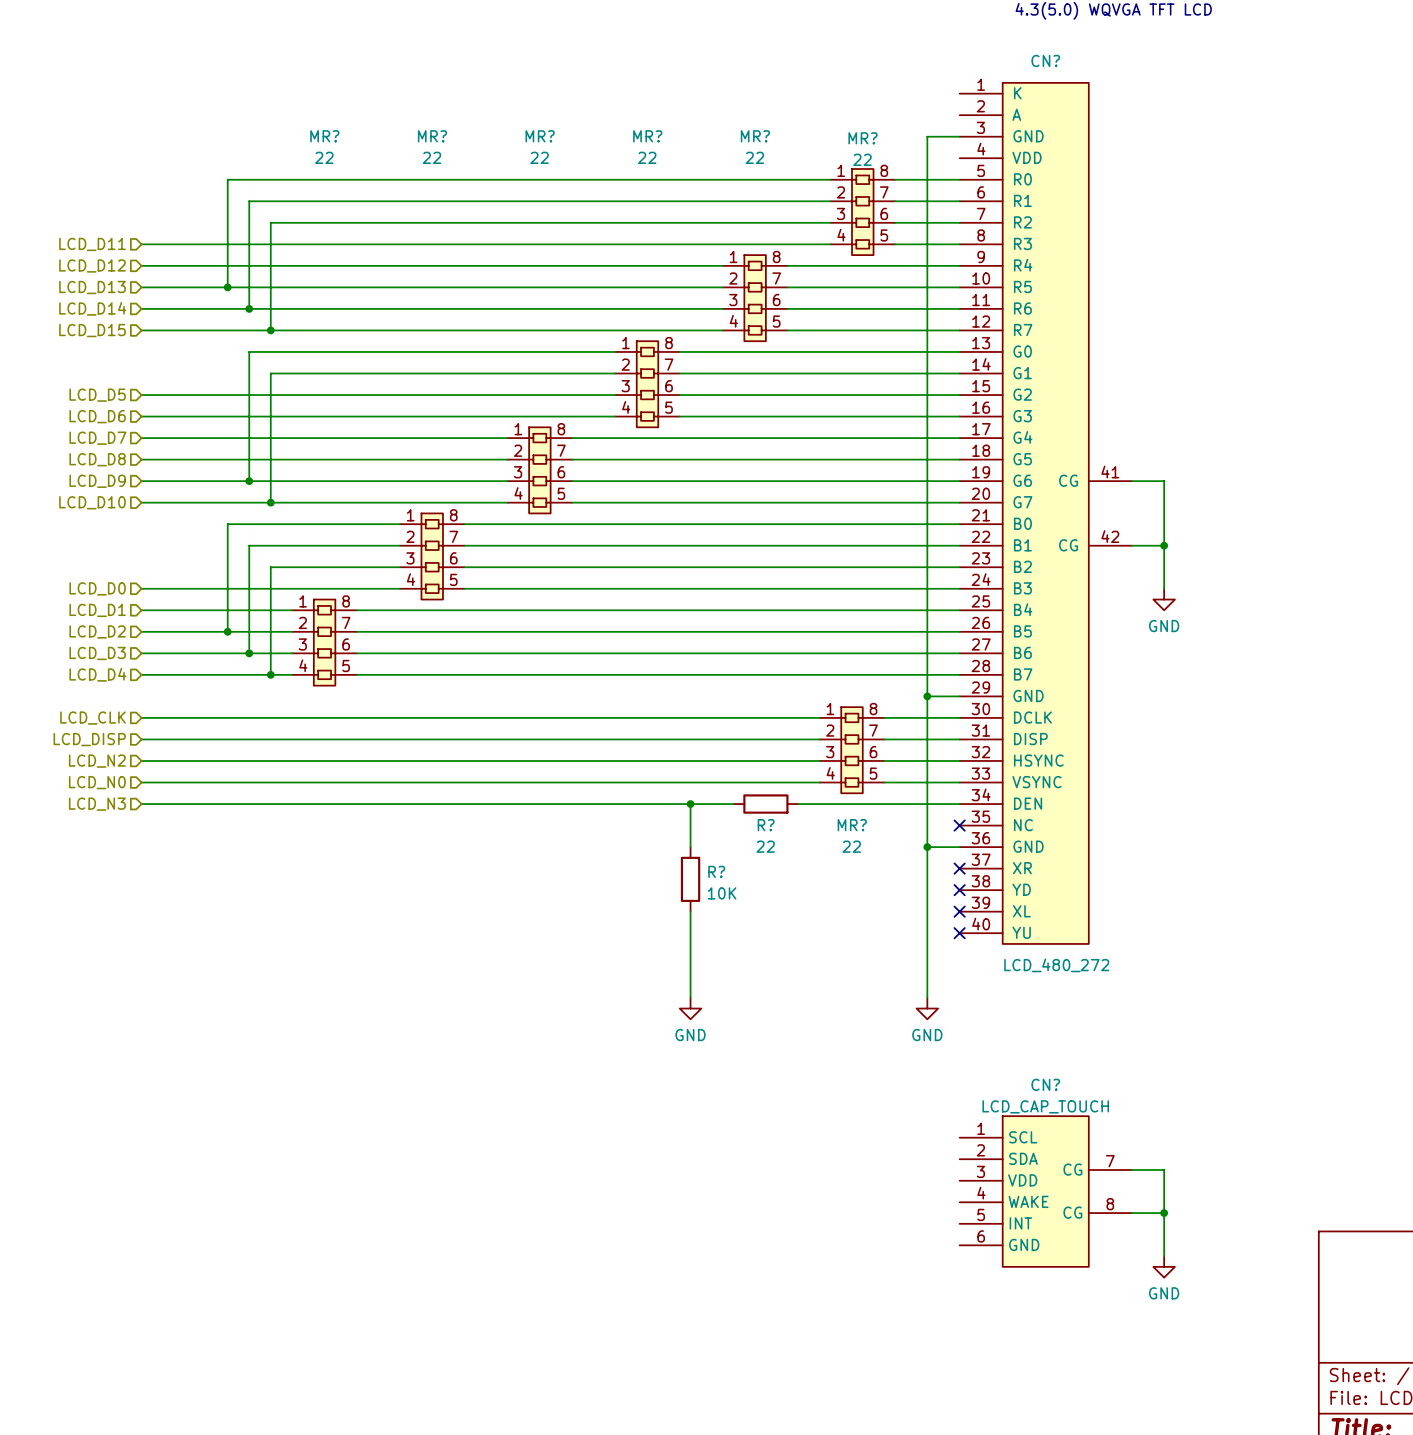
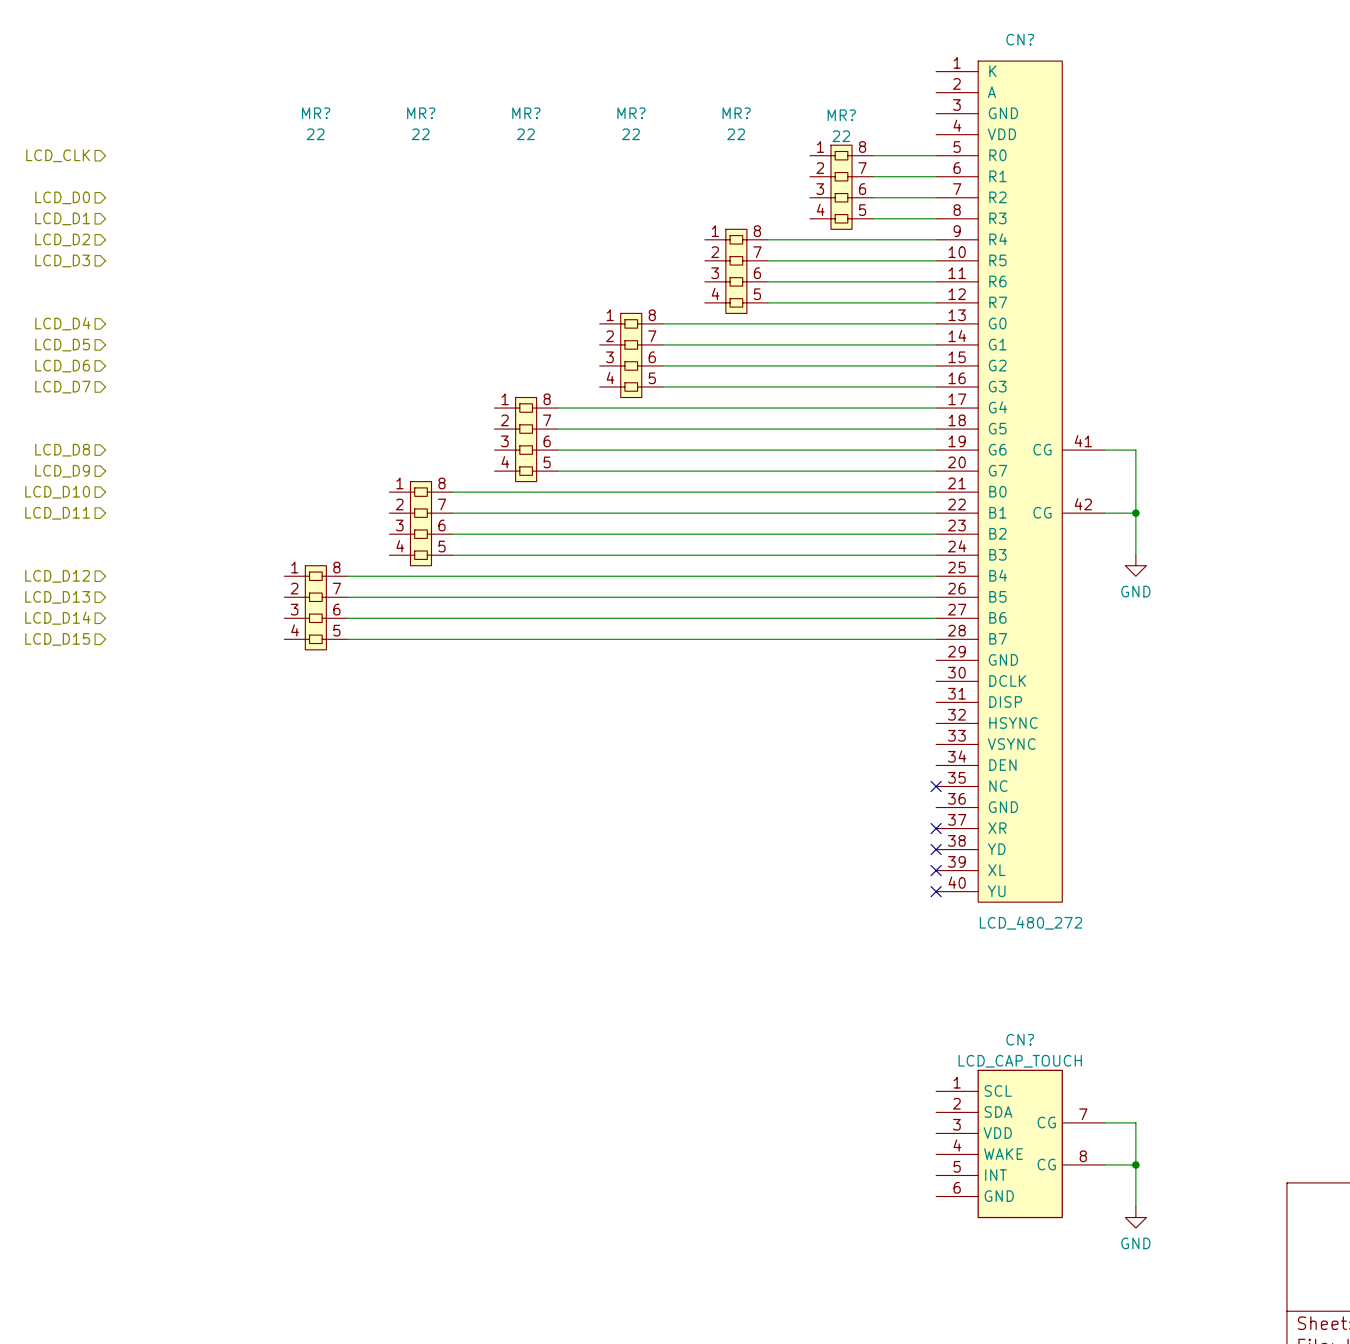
wire: (959, 136) (927, 136) (927, 997) -> none
hierarchical label: none -> LCD_CLK (58, 155)
wire: (830, 179) (227, 179) (227, 287) -> none
wire: (830, 201) (249, 201) (249, 308) -> none
hierarchical label: none -> LCD_D0 (62, 197)
wire: (830, 222) (270, 222) (270, 330) -> none
hierarchical label: none -> LCD_D1 (62, 218)
hierarchical label: LCD_D11 (92, 244) -> none
wire: (141, 244) (830, 244) -> none
hierarchical label: none -> LCD_D2 (62, 239)
hierarchical label: LCD_D12 (92, 265) -> none
wire: (141, 265) (722, 265) -> none
hierarchical label: none -> LCD_D3 (62, 260)
hierarchical label: LCD_D13 (92, 287) -> none
wire: (141, 287) (722, 287) -> none
junction: (227, 287) -> none
hierarchical label: LCD_D14 (92, 308) -> none
wire: (141, 308) (722, 308) -> none
junction: (249, 308) -> none
hierarchical label: LCD_D15 (92, 330) -> LCD_D4 (62, 323)
wire: (141, 330) (722, 330) -> none
junction: (270, 330) -> none
wire: (615, 351) (249, 351) (249, 481) -> none
wire: (615, 373) (270, 373) (270, 502) -> none
hierarchical label position: LCD_D5 (97, 395) -> LCD_D5 (62, 345)
wire: (141, 395) (615, 395) -> none
hierarchical label position: LCD_D6 (97, 416) -> LCD_D6 (62, 366)
wire: (141, 416) (615, 416) -> none
hierarchical label position: LCD_D7 (97, 438) -> LCD_D7 (62, 387)
wire: (141, 438) (507, 438) -> none
hierarchical label position: LCD_D8 (97, 459) -> LCD_D8 (62, 450)
wire: (141, 459) (507, 459) -> none
hierarchical label position: LCD_D9 (97, 481) -> LCD_D9 (62, 471)
wire: (141, 481) (507, 481) -> none
junction: (249, 481) -> none
hierarchical label position: LCD_D10 (92, 502) -> LCD_D10 (57, 492)
wire: (141, 502) (507, 502) -> none
junction: (270, 502) -> none
wire: (399, 524) (227, 524) (227, 631) -> none
hierarchical label: none -> LCD_D11 (57, 513)
wire: (399, 545) (249, 545) (249, 653) -> none
wire: (399, 567) (270, 567) (270, 674) -> none
hierarchical label: LCD_D0 (97, 588) -> none
wire: (141, 588) (399, 588) -> none
hierarchical label: none -> LCD_D12 (57, 576)
hierarchical label: LCD_D1 (97, 610) -> none
wire: (141, 610) (292, 610) -> none
hierarchical label: none -> LCD_D13 (57, 597)
hierarchical label: LCD_D2 (97, 631) -> none
wire: (141, 631) (292, 631) -> none
junction: (227, 631) -> none
hierarchical label: none -> LCD_D14 (57, 618)
hierarchical label: LCD_D3 (97, 653) -> none
wire: (141, 653) (292, 653) -> none
junction: (249, 653) -> none
hierarchical label: none -> LCD_D15 (57, 639)
hierarchical label: LCD_D4 (97, 674) -> none
wire: (141, 674) (292, 674) -> none
junction: (270, 674) -> none
wire: (927, 696) (959, 696) -> none
junction: (927, 696) -> none
wire: (141, 717) (819, 717) -> none
wire: (884, 717) (959, 717) -> none
hierarchical label: LCD_CLK (93, 718) -> none
hierarchical label: LCD_DISP (89, 739) -> none
wire: (141, 739) (819, 739) -> none
wire: (884, 739) (959, 739) -> none
MR?: 22 (852, 750) -> none
wire: (141, 760) (819, 760) -> none
wire: (884, 760) (959, 760) -> none
hierarchical label: LCD_N2 (97, 761) -> none
hierarchical label: LCD_N0 (97, 782) -> none
wire: (141, 782) (819, 782) -> none
wire: (884, 782) (959, 782) -> none
hierarchical label: LCD_N3 (97, 804) -> none
wire: (141, 804) (733, 804) -> none
wire: (690, 804) (690, 847) -> none
junction: (690, 804) -> none
R?: 22 (765, 804) -> none
wire: (798, 804) (959, 804) -> none
wire: (927, 847) (959, 847) -> none
junction: (927, 847) -> none
R?: 10K (690, 879) -> none
wire: (690, 911) (690, 997) -> none
power symbol: GND (690, 1008) -> none
power symbol: GND (927, 1008) -> none

